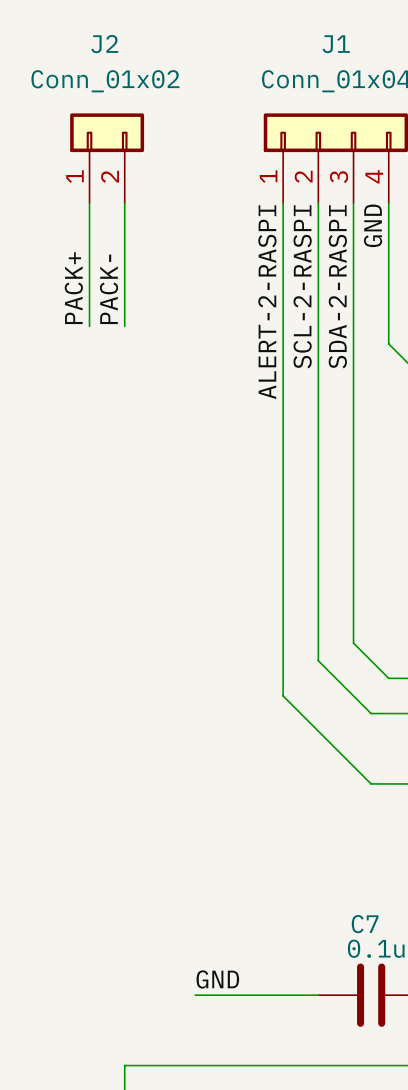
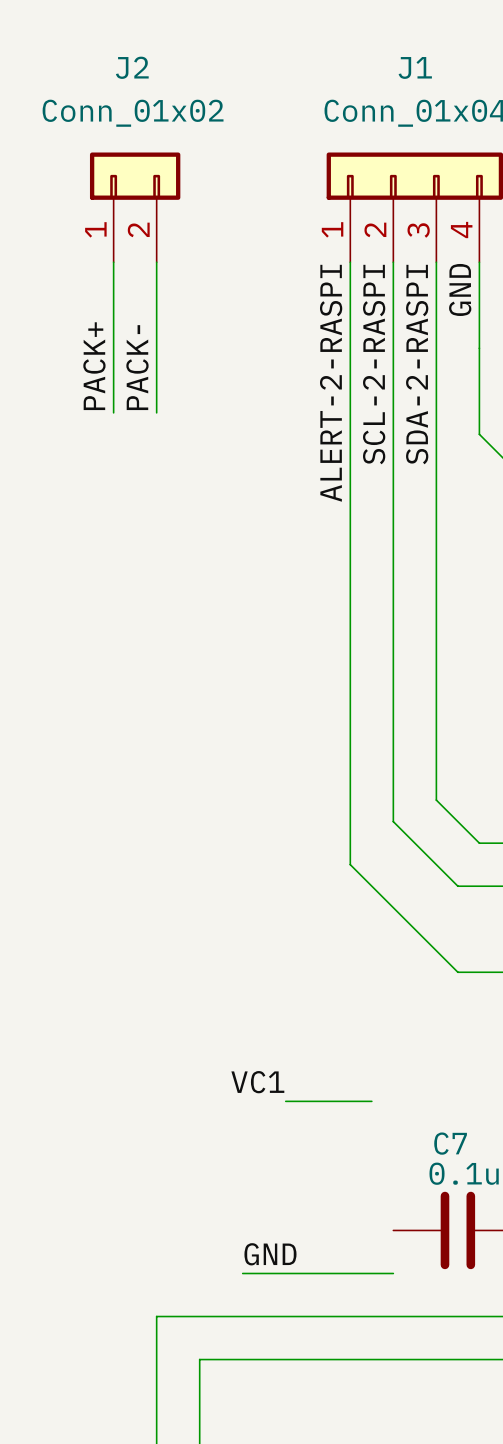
label: none -> VC1 (257, 1082)
wire: none -> (285, 1101) (371, 1101)
label position: GND (217, 979) -> GND (270, 1254)
wire: (195, 995) (318, 995) -> (242, 1273) (393, 1273)

